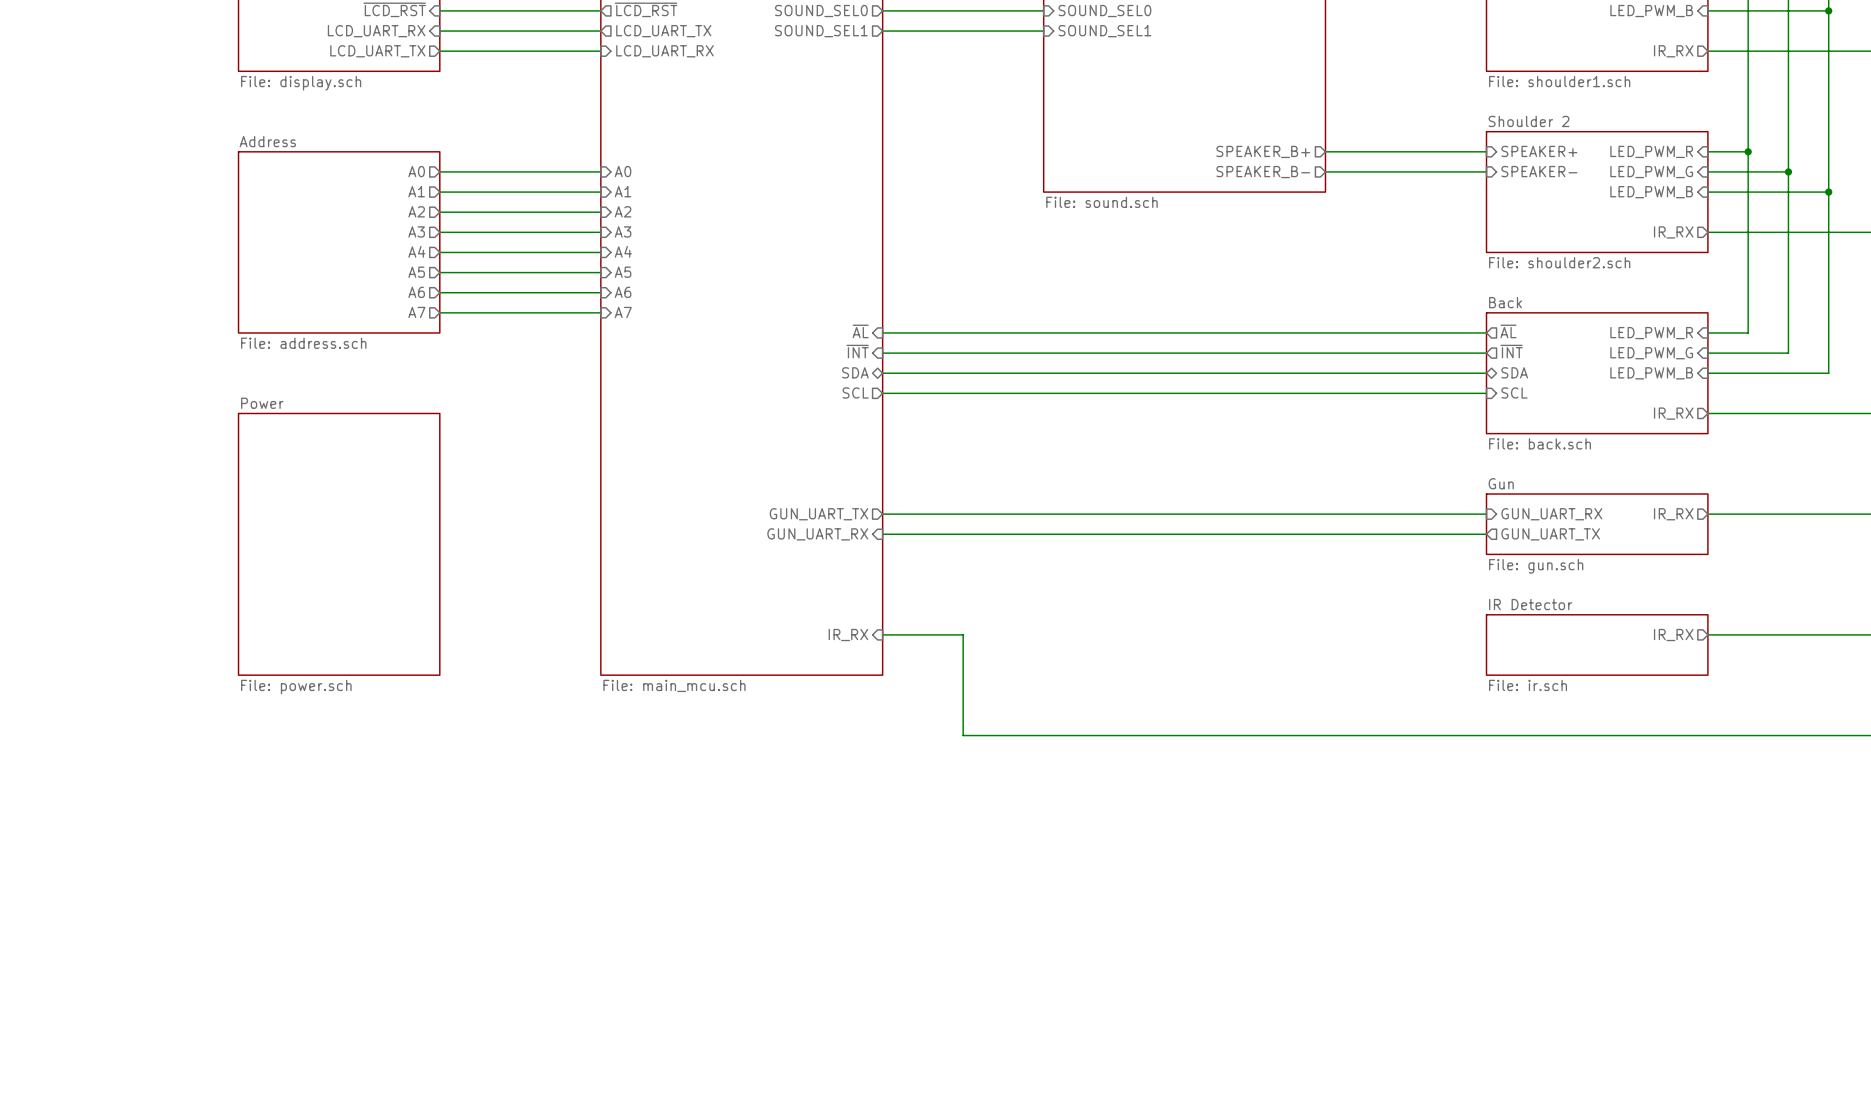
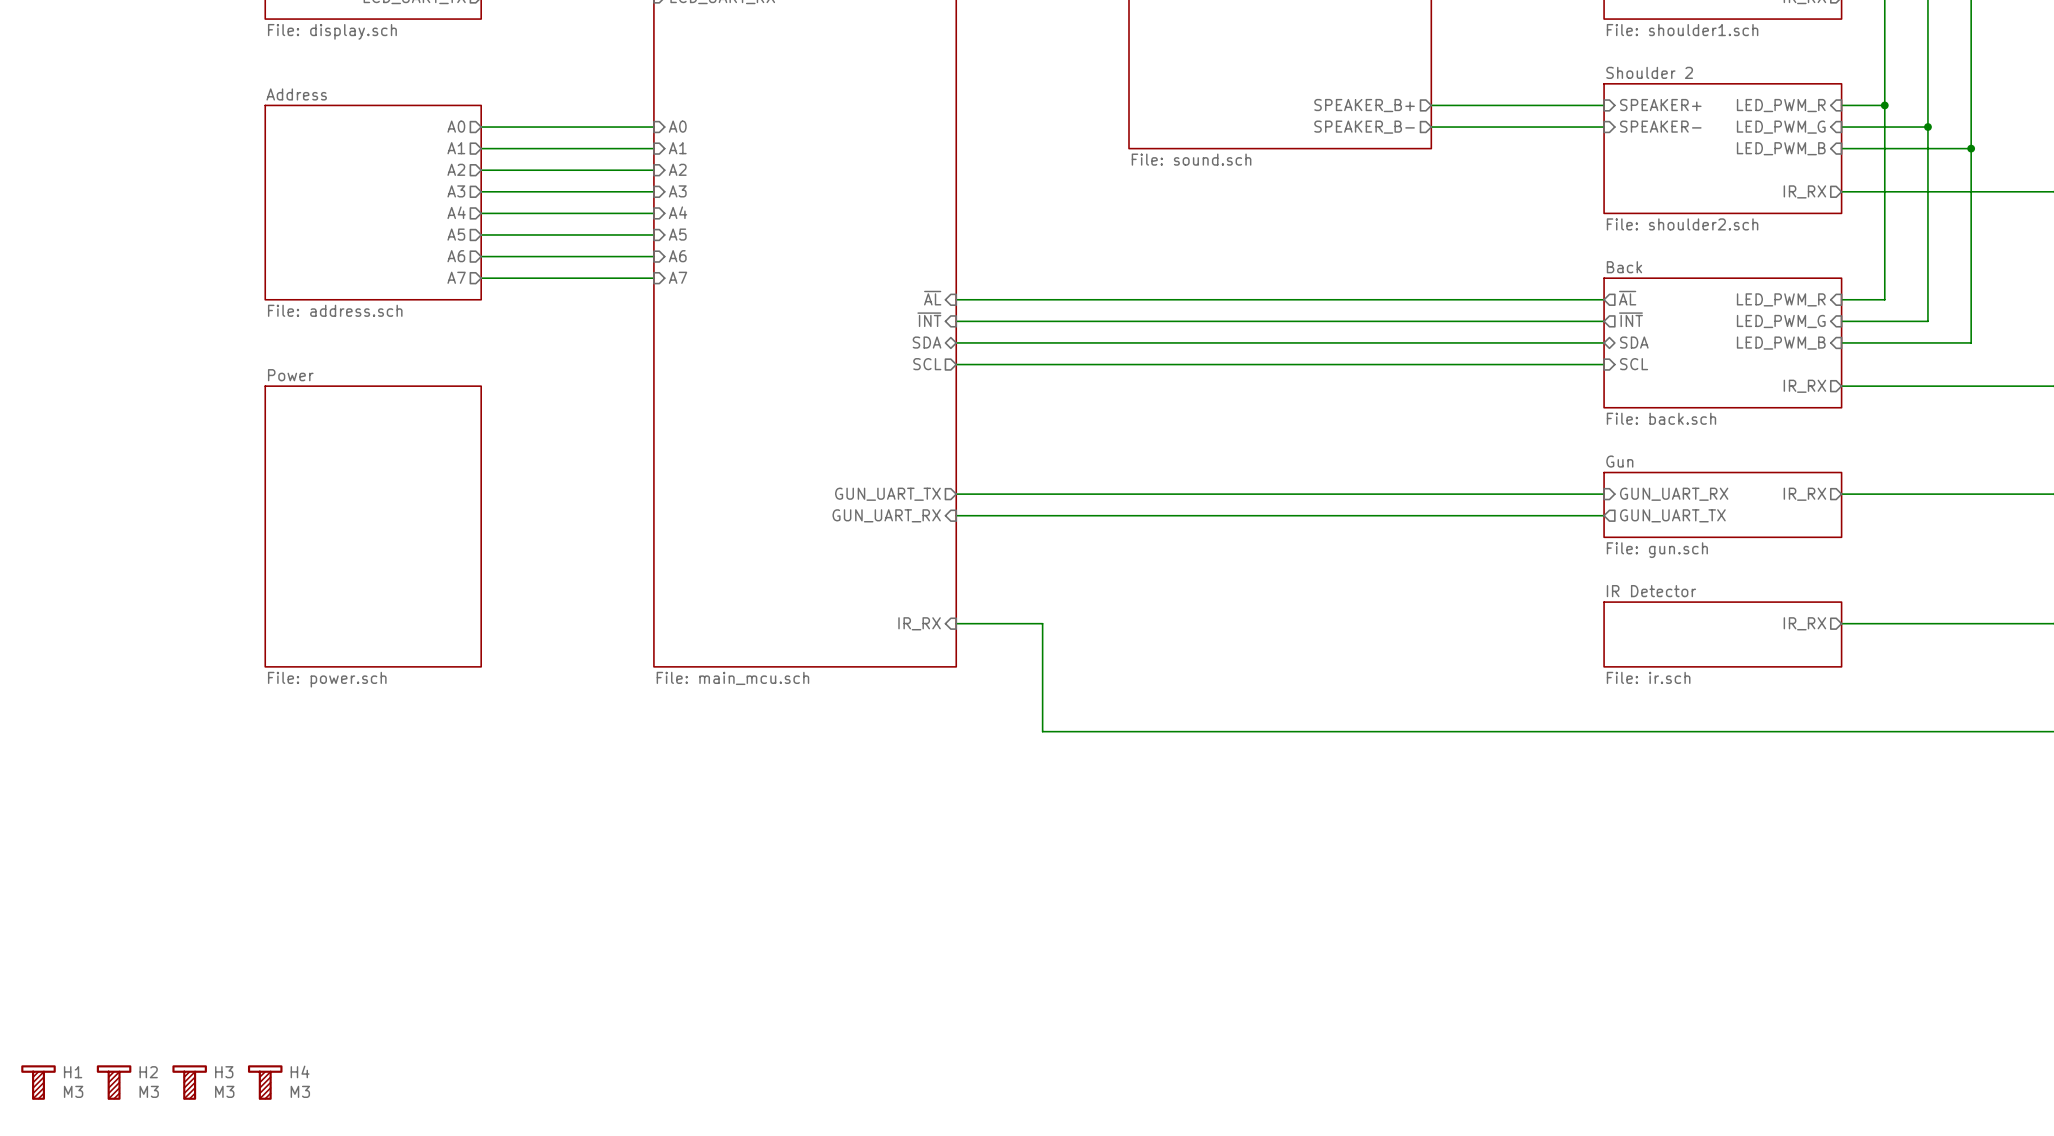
H1: none -> M3 (38, 1082)
H2: none -> M3 (114, 1082)
H3: none -> M3 (189, 1082)
H4: none -> M3 (265, 1082)

